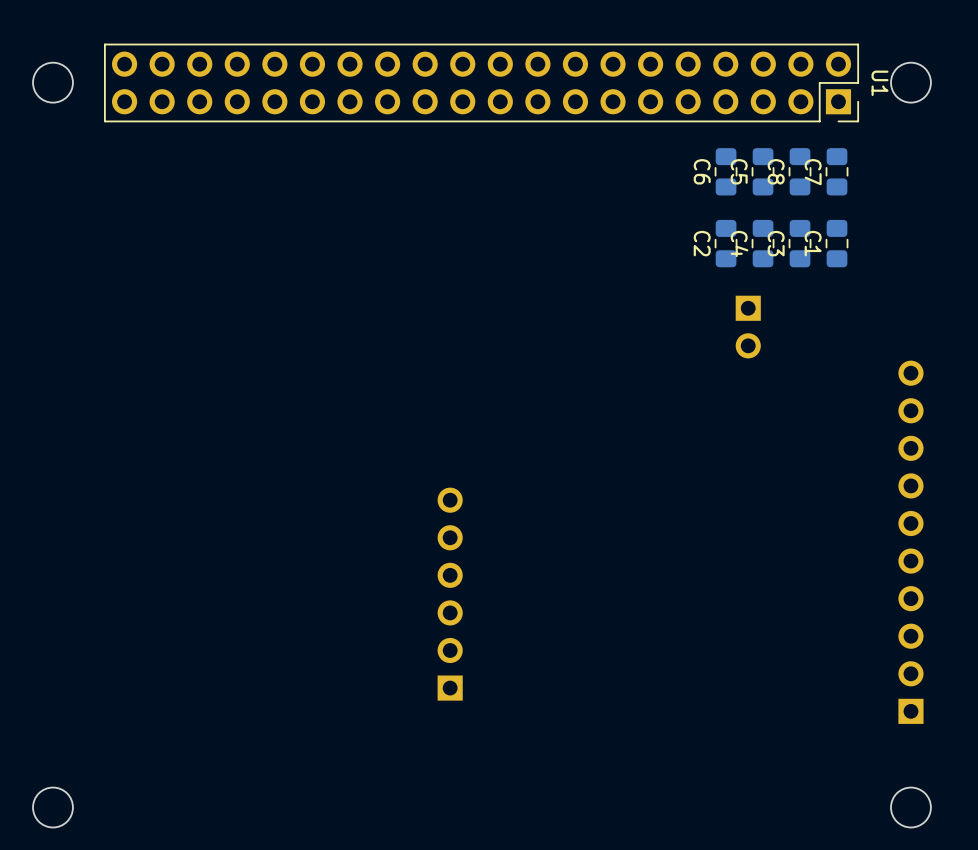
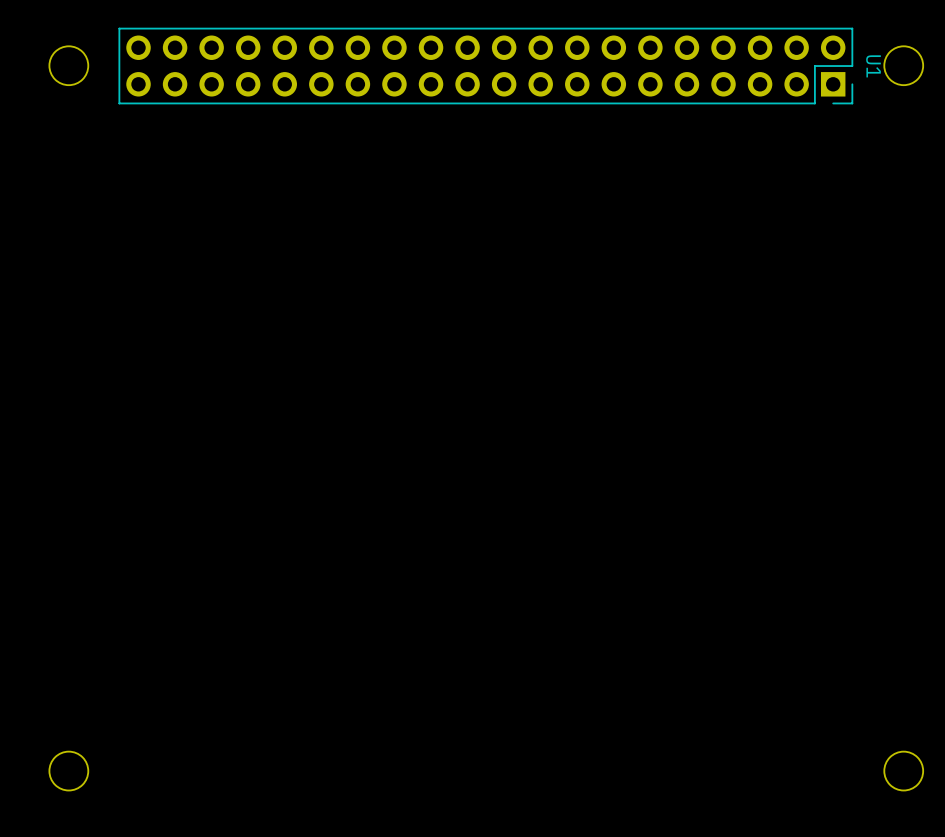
C6: (726, 171) -> none
C5: (763, 171) -> none
C8: (800, 171) -> none
C7: (837, 171) -> none
C2: (726, 243) -> none
C4: (763, 243) -> none
C3: (800, 243) -> none
C1: (837, 243) -> none
part: (748, 327) -> none
part: (910, 542) -> none
part: (450, 594) -> none

